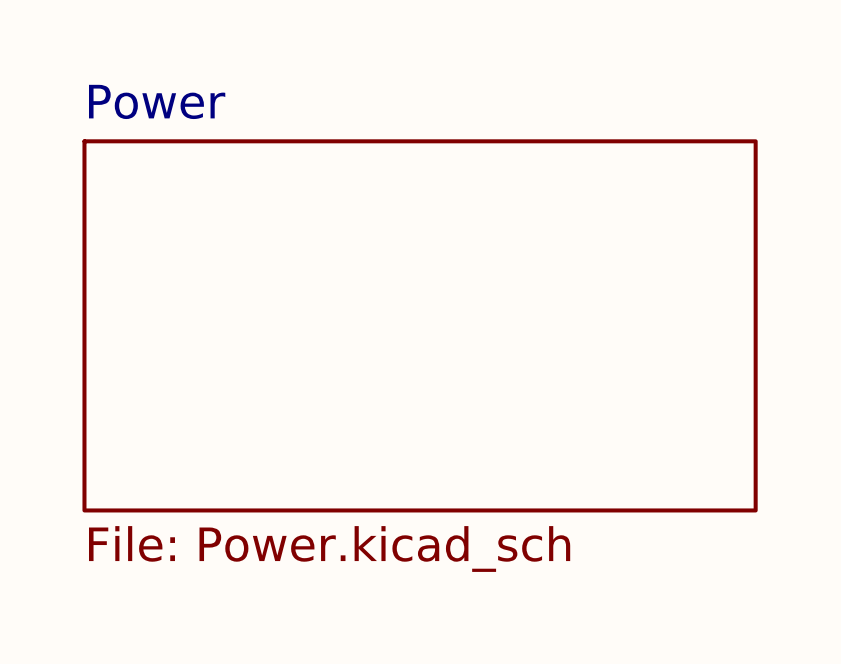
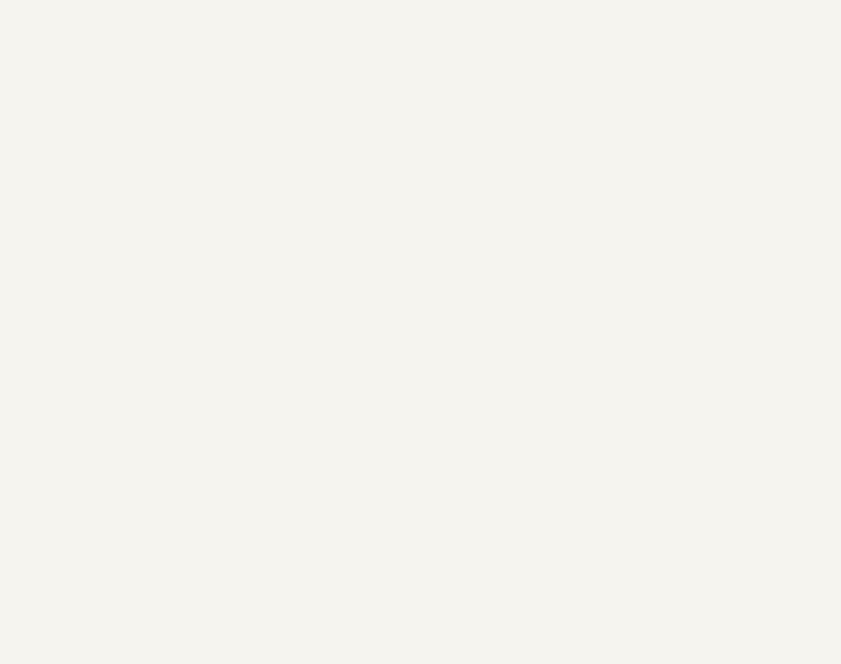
sheet Power: File: Power.kicad_sch (420, 325) -> none

